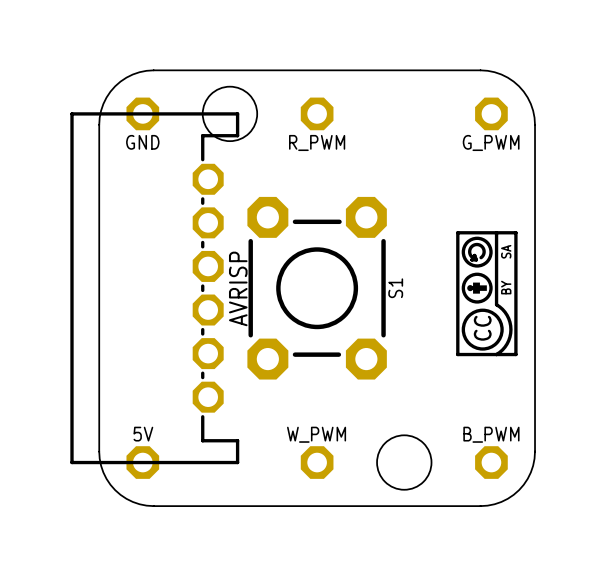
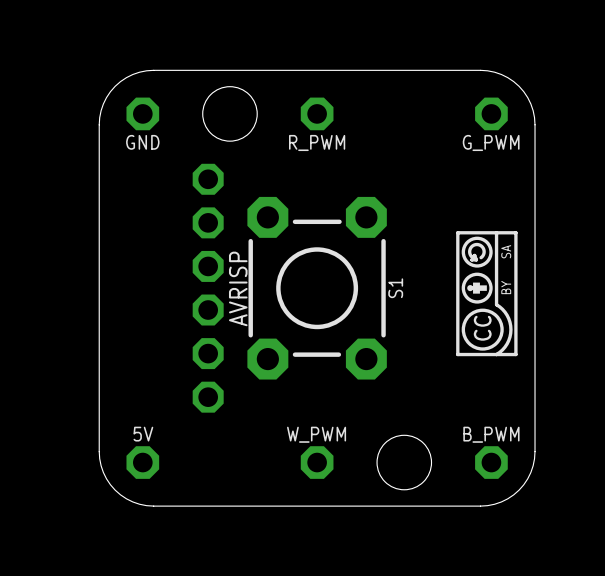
AVRISP: (154, 288) -> none
AVRISP: none -> (208, 288)

